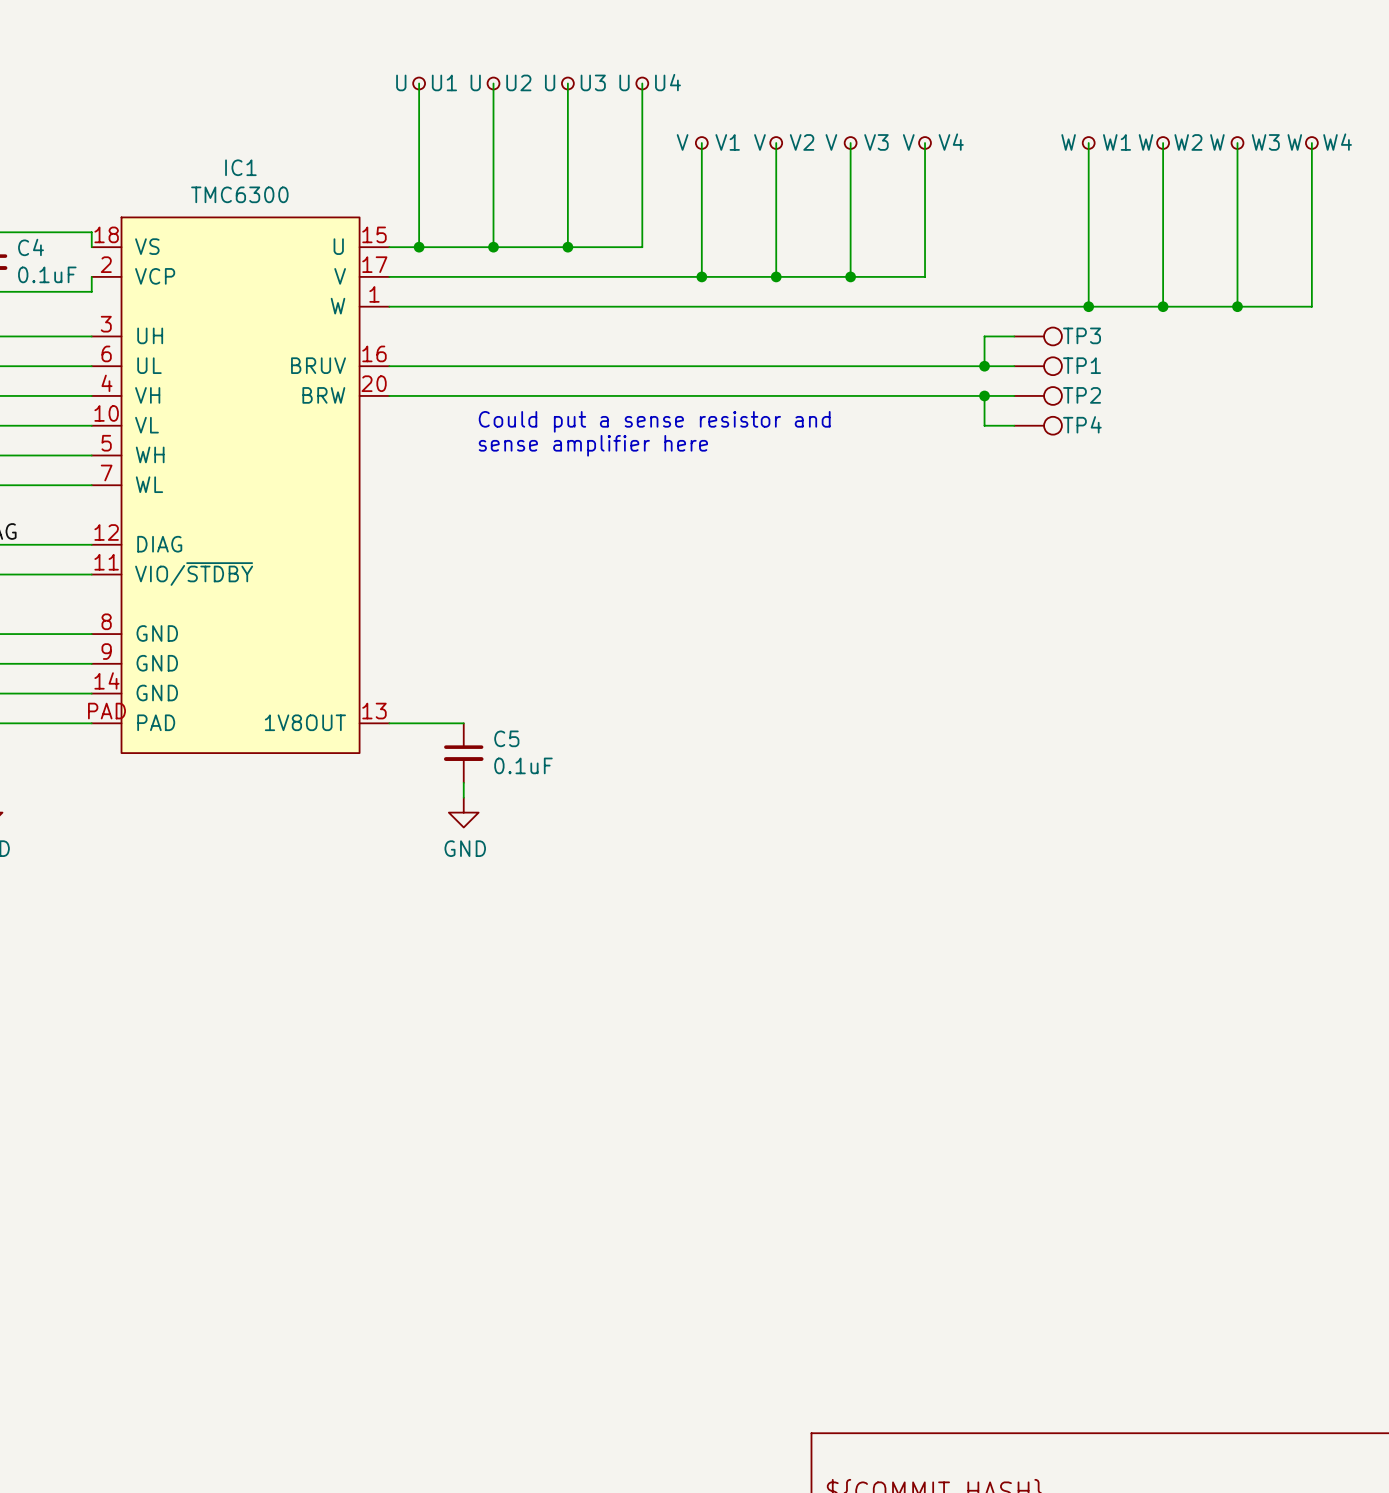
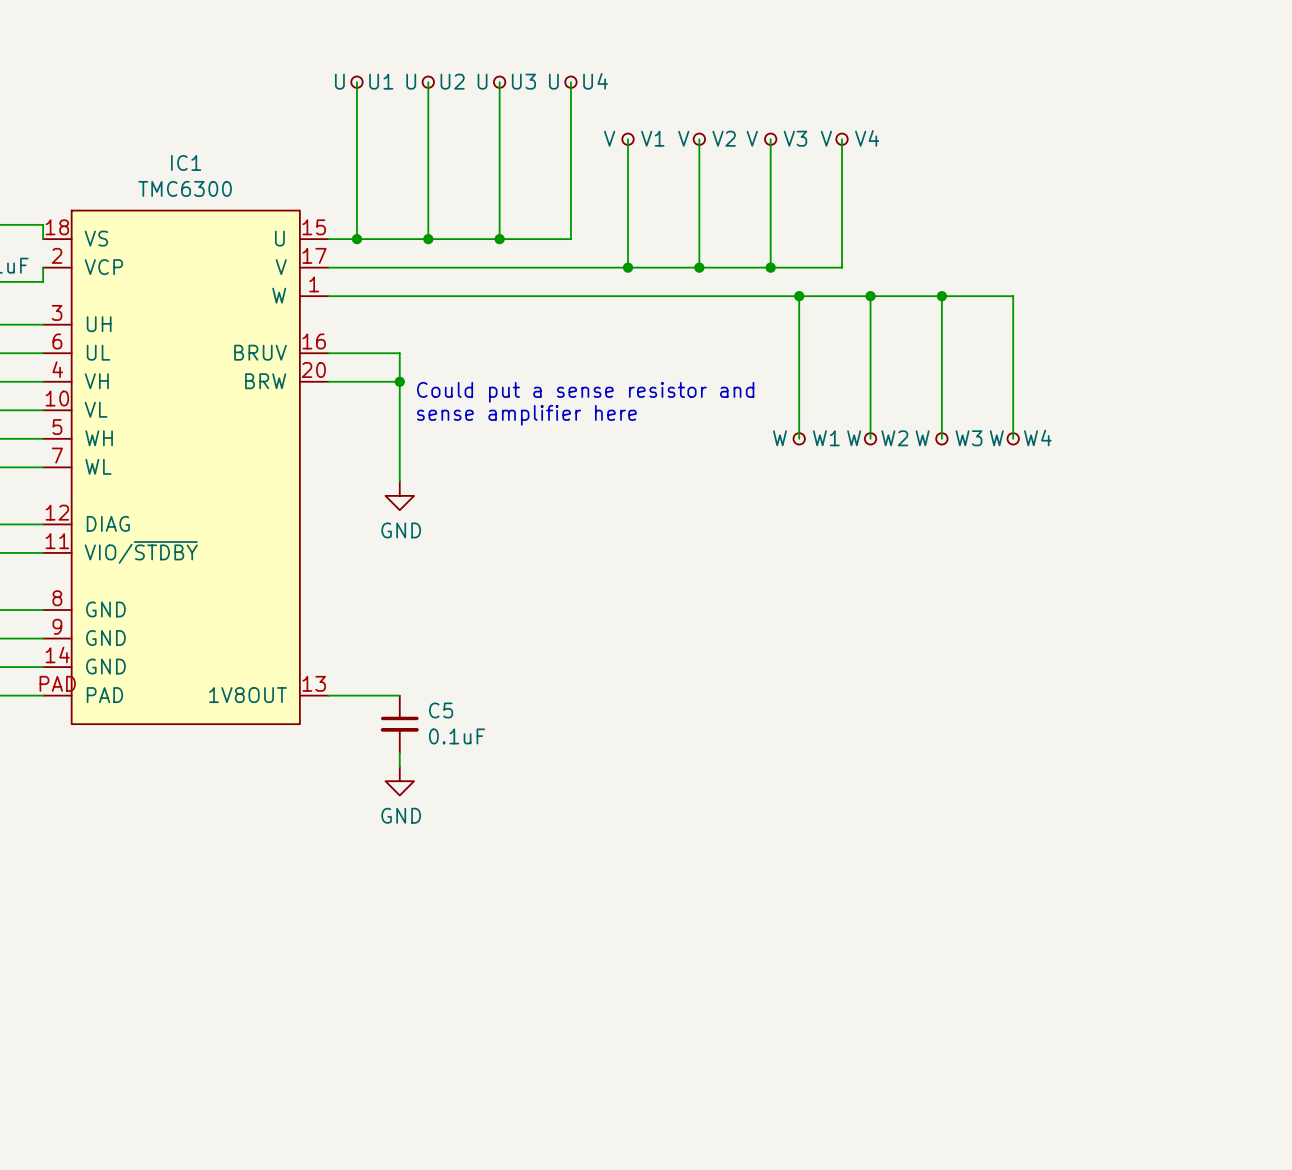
wire: (1088, 143) (1088, 306) -> none
W1 position: (1088, 143) -> (799, 438)
wire: (1163, 143) (1163, 306) -> none
W2 position: (1163, 143) -> (870, 438)
wire: (1237, 143) (1237, 306) -> none
W3 position: (1237, 143) -> (941, 438)
wire: (1311, 143) (1311, 306) (1103, 306) -> (1013, 438) (1013, 296)
W4 position: (1311, 143) -> (1013, 438)
wire: none -> (799, 296) (799, 438)
junction: none -> (799, 296)
wire: none -> (870, 296) (870, 438)
junction: none -> (870, 296)
wire: none -> (941, 296) (941, 438)
junction: none -> (941, 296)
junction: (1088, 306) -> none
junction: (1163, 306) -> none
junction: (1237, 306) -> none
wire: (1014, 336) (984, 336) (984, 366) -> none
TP3: (1038, 336) -> none
wire: (463, 366) (1014, 366) -> (399, 353) (399, 481)
junction: (984, 366) -> none
TP1: (1038, 366) -> none
wire: (463, 395) (1014, 395) -> none
junction: none -> (399, 381)
wire: (984, 395) (984, 425) (1014, 425) -> none
junction: (984, 395) -> none
TP2: (1038, 395) -> none
text position: Could put a sense resistor and (654, 421) -> Could put a sense resistor and (585, 392)
TP4: (1038, 425) -> none
text position: sense amplifier here (593, 445) -> sense amplifier here (526, 415)
power symbol: none -> GND (399, 495)

